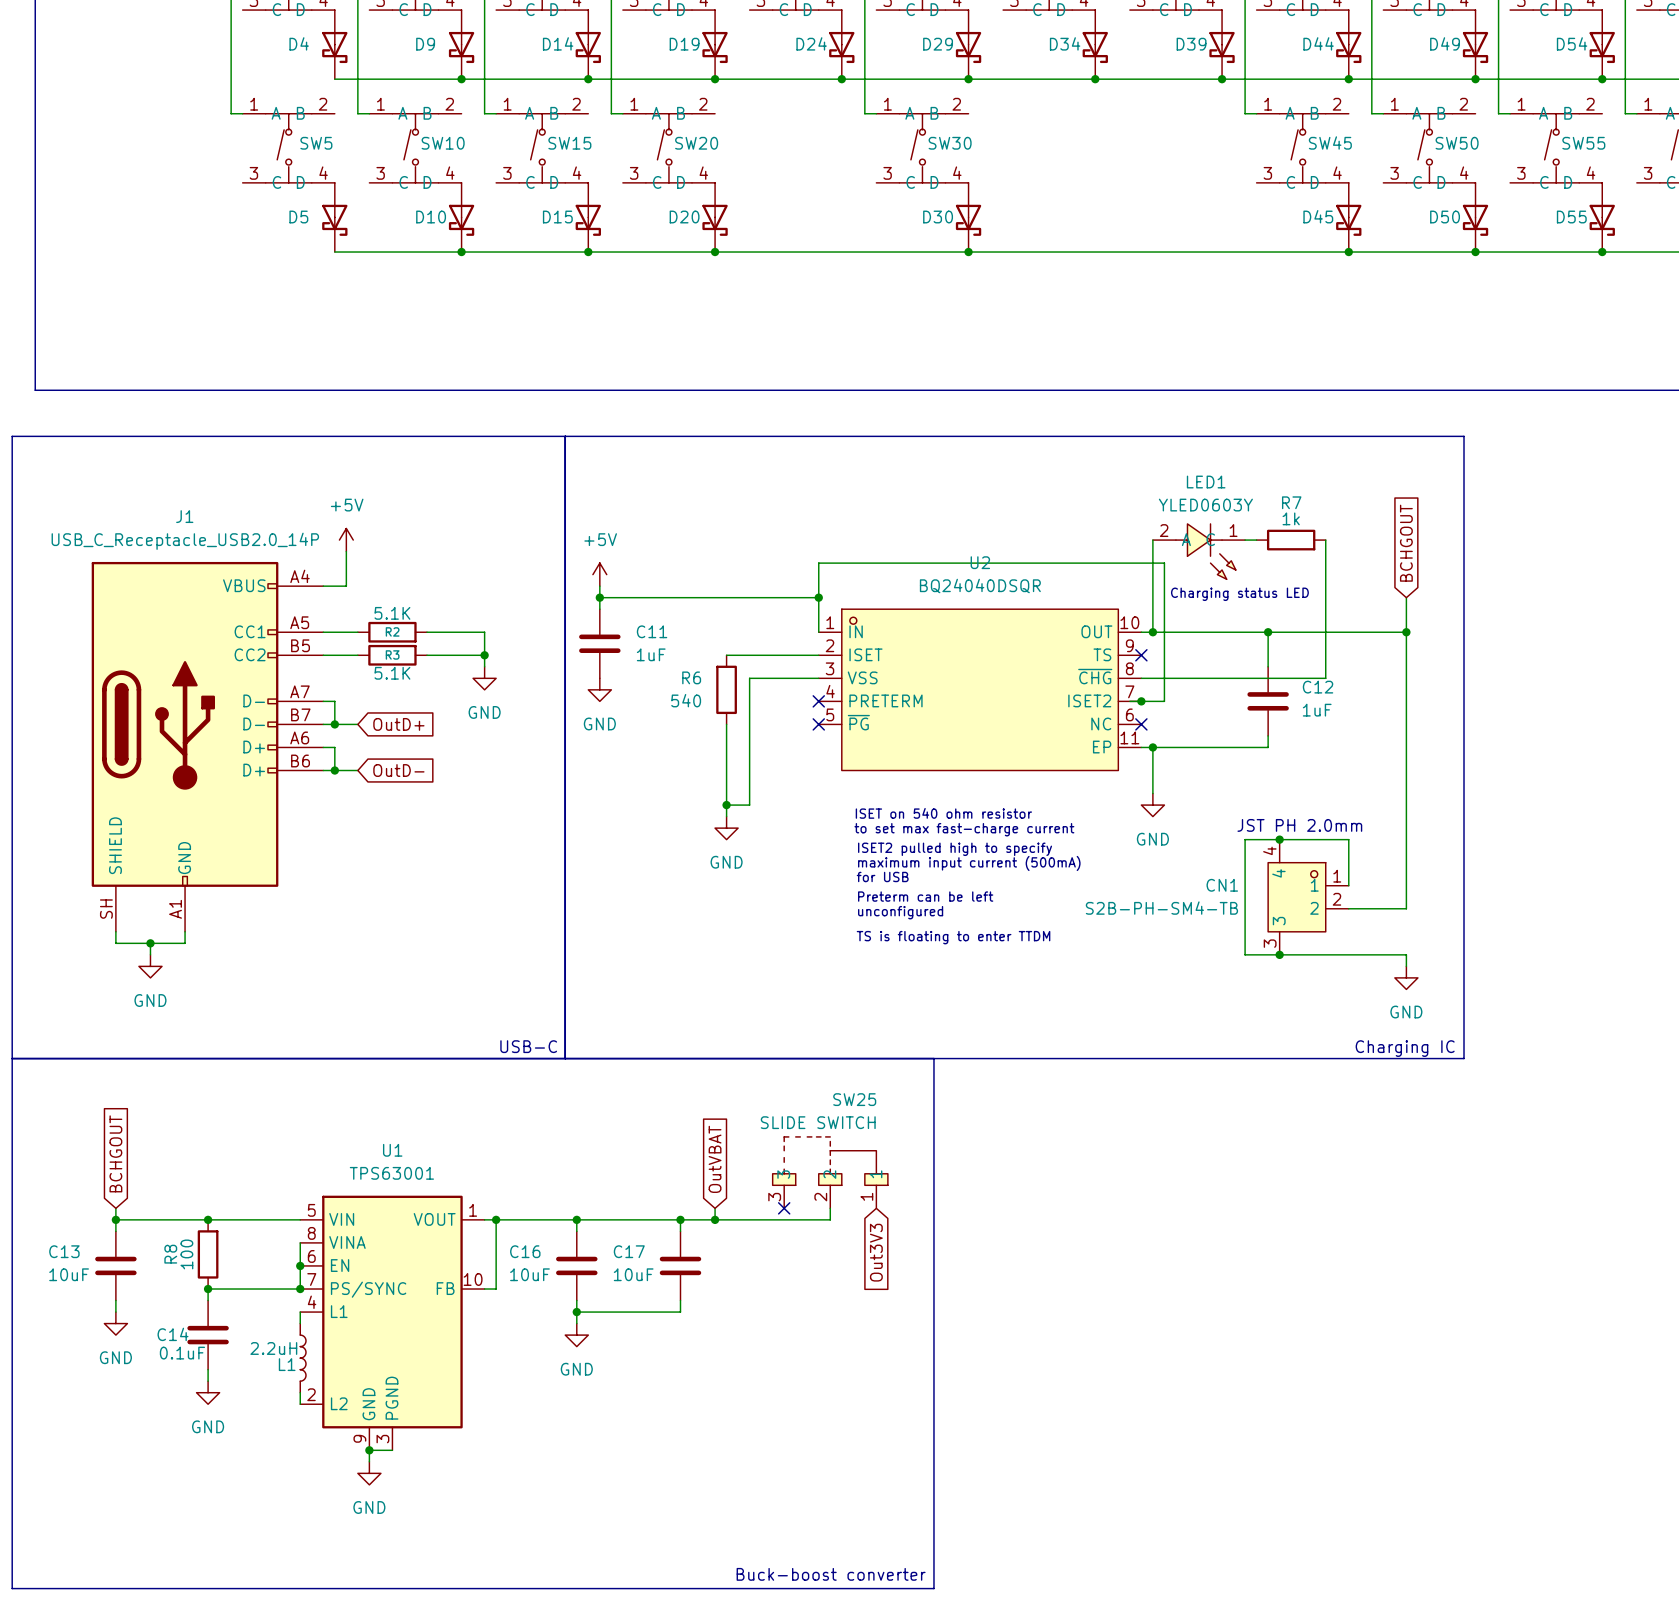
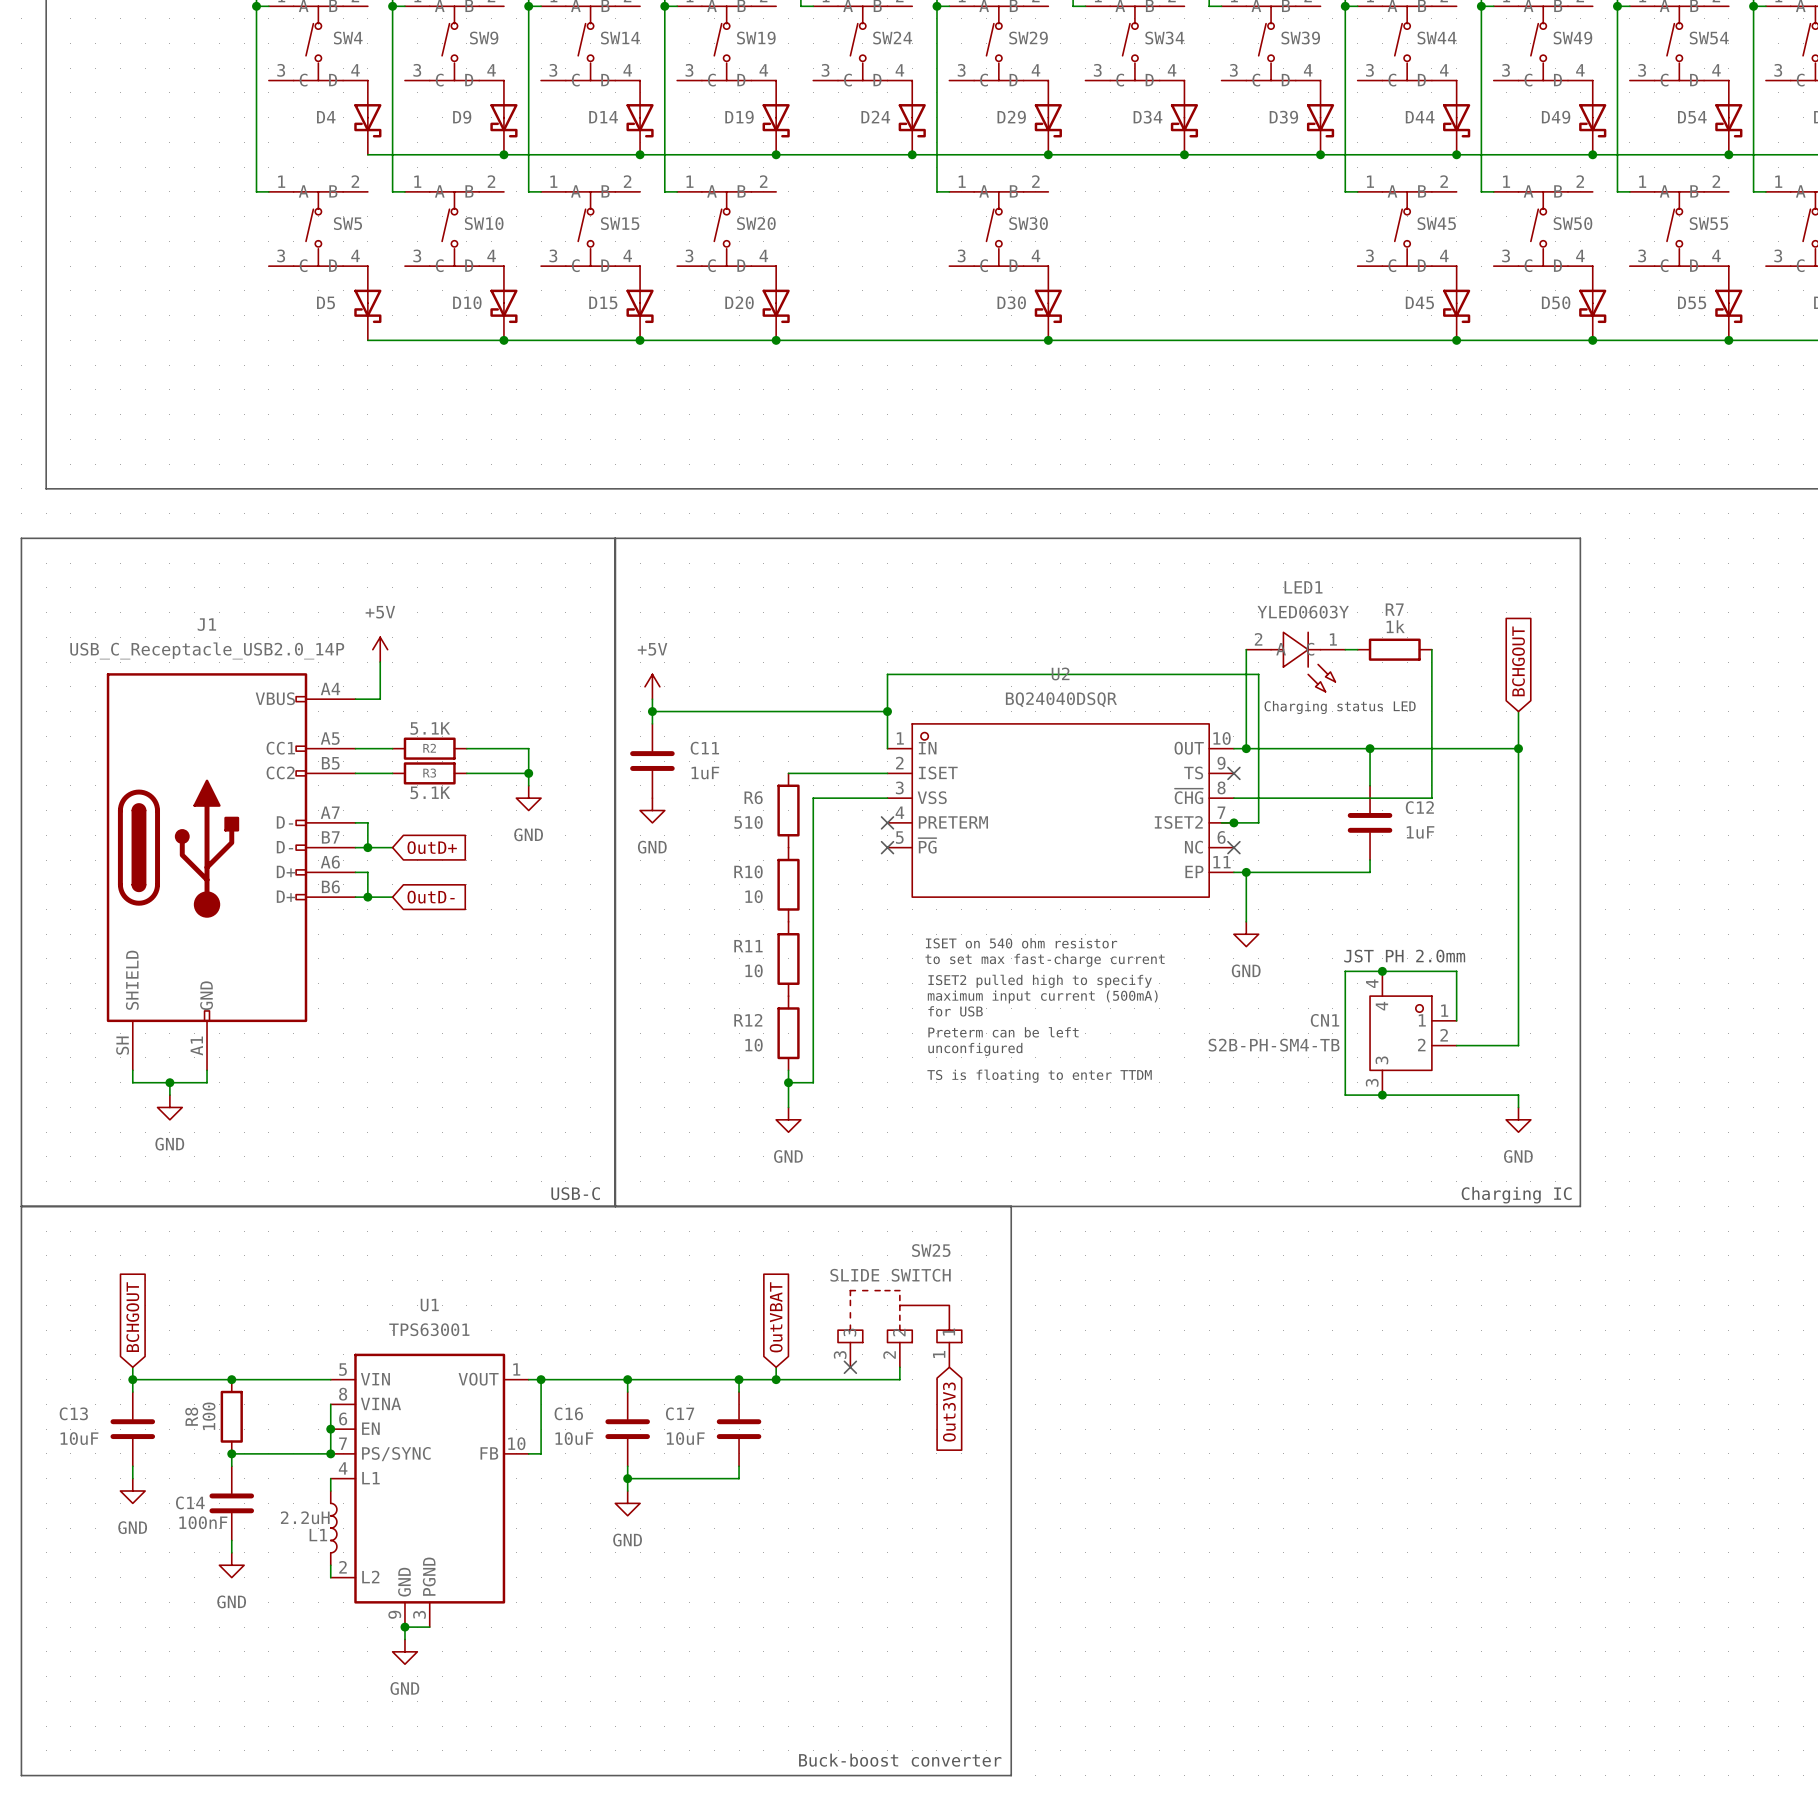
R6 value: 540 (686, 700) -> 510 (748, 822)
wire: (726, 724) (726, 816) -> none
R10: none -> 10 (788, 884)
wire: (726, 805) (749, 805) -> (788, 1082) (813, 1082) (813, 934)
junction: (726, 805) -> none
R11: none -> 10 (788, 958)
power symbol position: GND (726, 828) -> GND (788, 1119)
R12: none -> 10 (788, 1033)
wire: none -> (788, 1070) (788, 1107)
junction: none -> (788, 1082)
C14 value: 0.1uF (182, 1353) -> 100nF (203, 1522)

